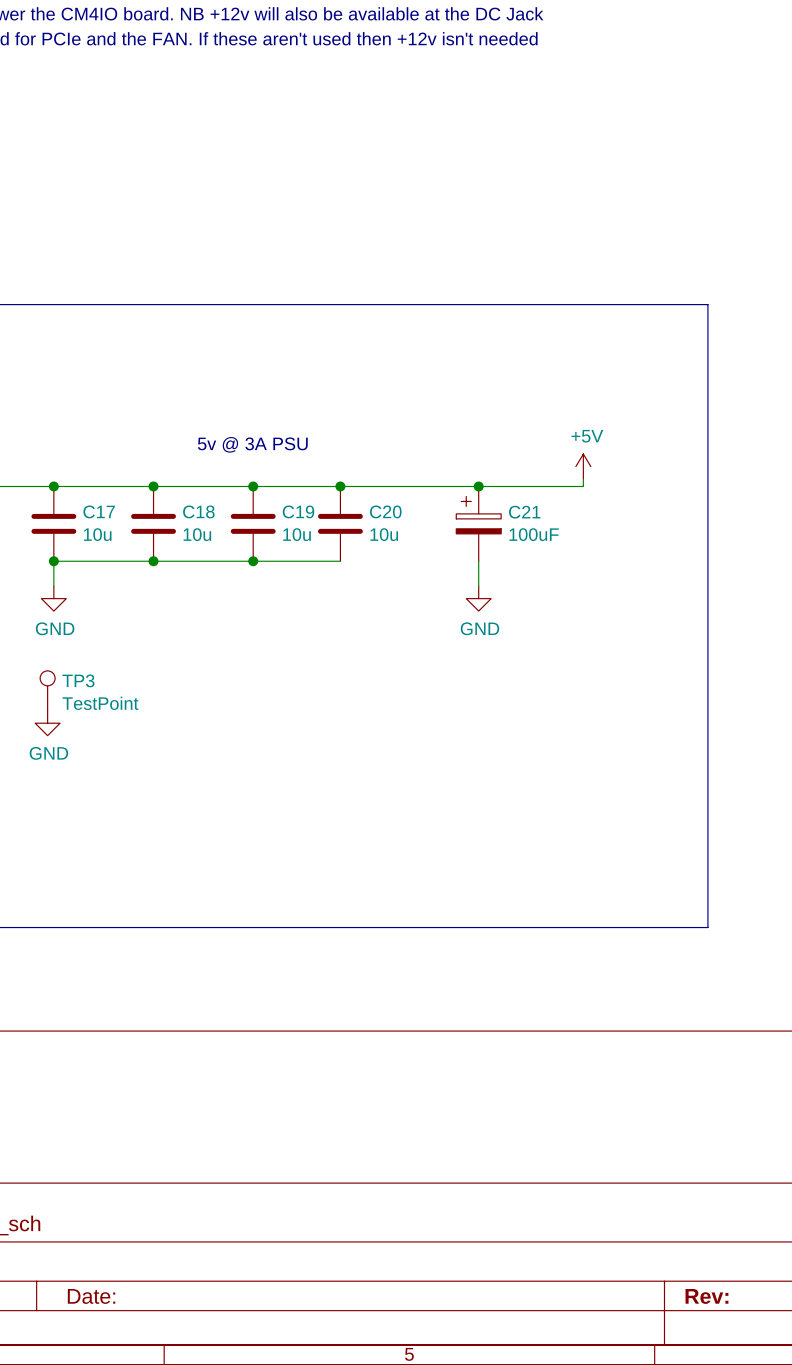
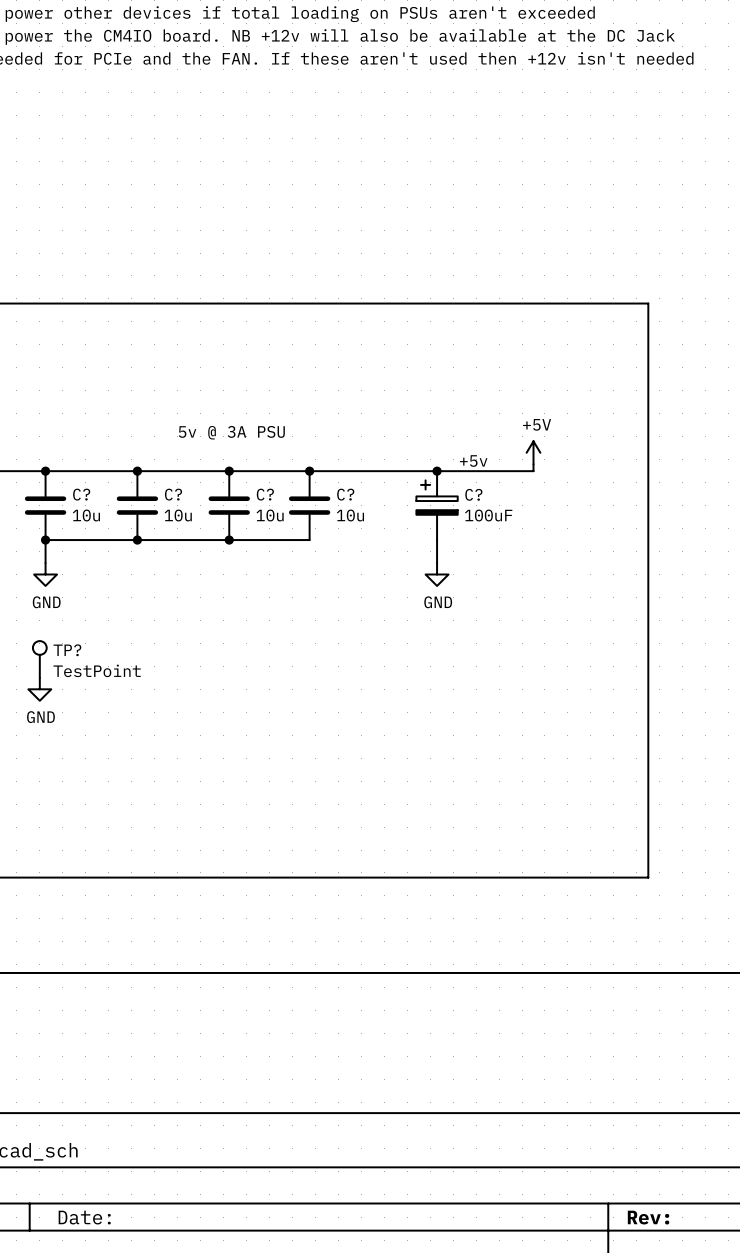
label: none -> +5v (473, 461)
C17 name: C17 (99, 511) -> C? (81, 494)
C18 name: C18 (198, 511) -> C? (173, 494)
C19 name: C19 (298, 511) -> C? (265, 494)
C20 name: C20 (385, 511) -> C? (345, 494)
C21 name: C21 (524, 512) -> C? (473, 494)
TP3 name: TP3 (78, 680) -> TP? (67, 650)

